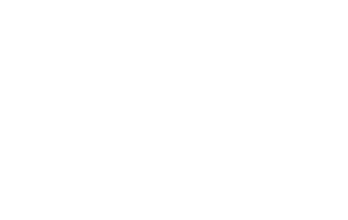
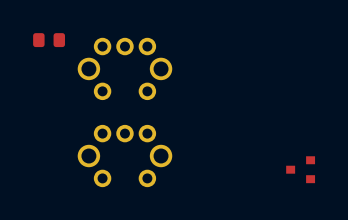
part: none -> (49, 40)
part: none -> (124, 68)
part: none -> (124, 156)
part: none -> (300, 169)

